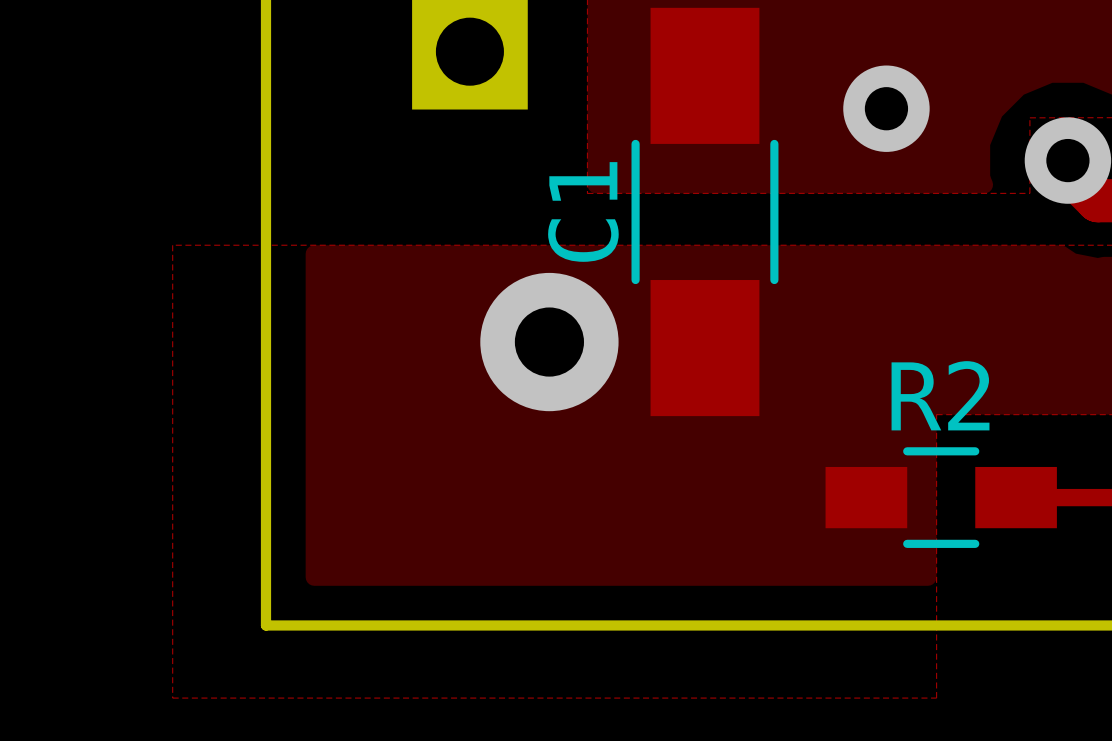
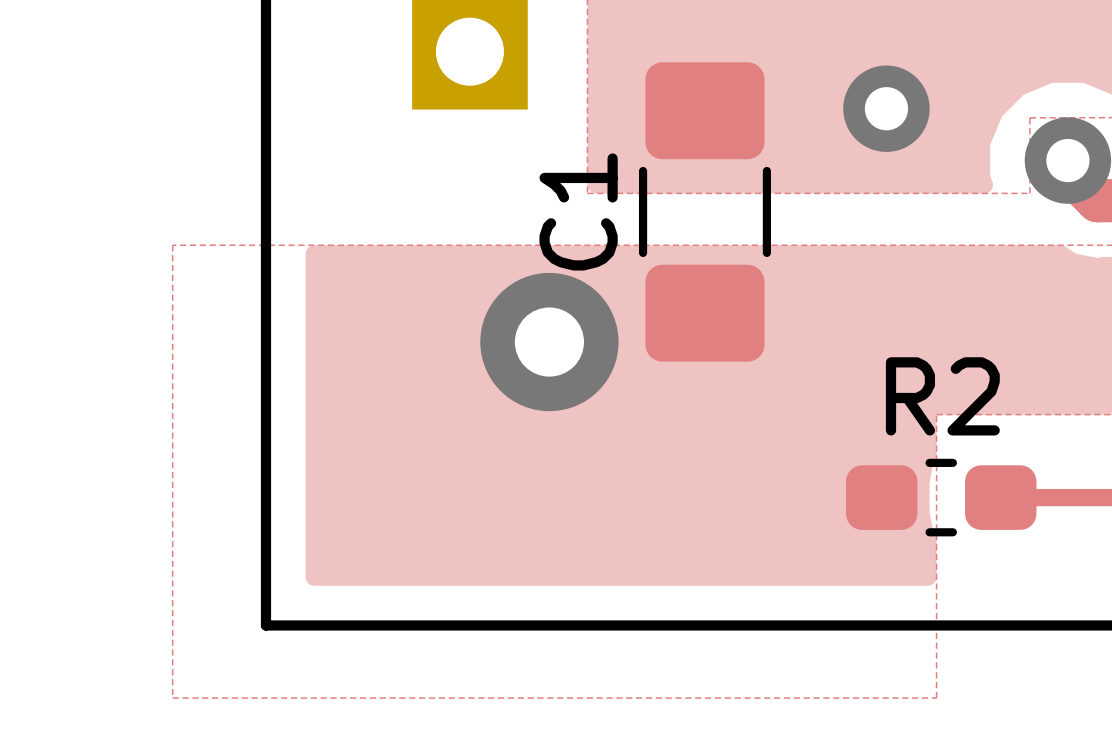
C1 footprint: [631, 7, 779, 417] -> [638, 62, 771, 362]
R2 footprint: [825, 447, 1057, 548] -> [845, 458, 1037, 537]

